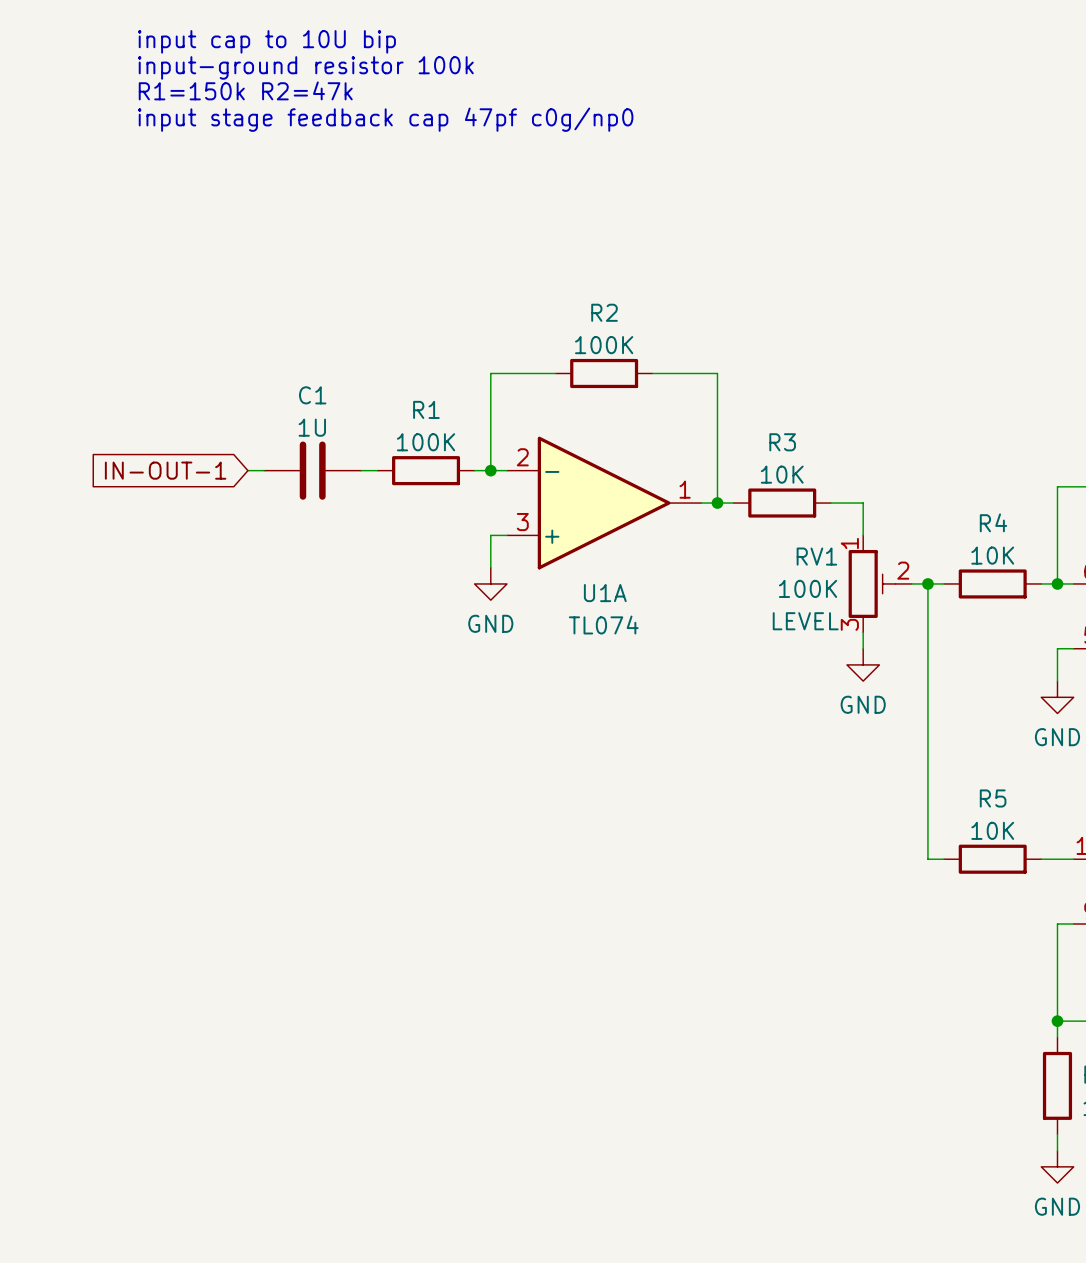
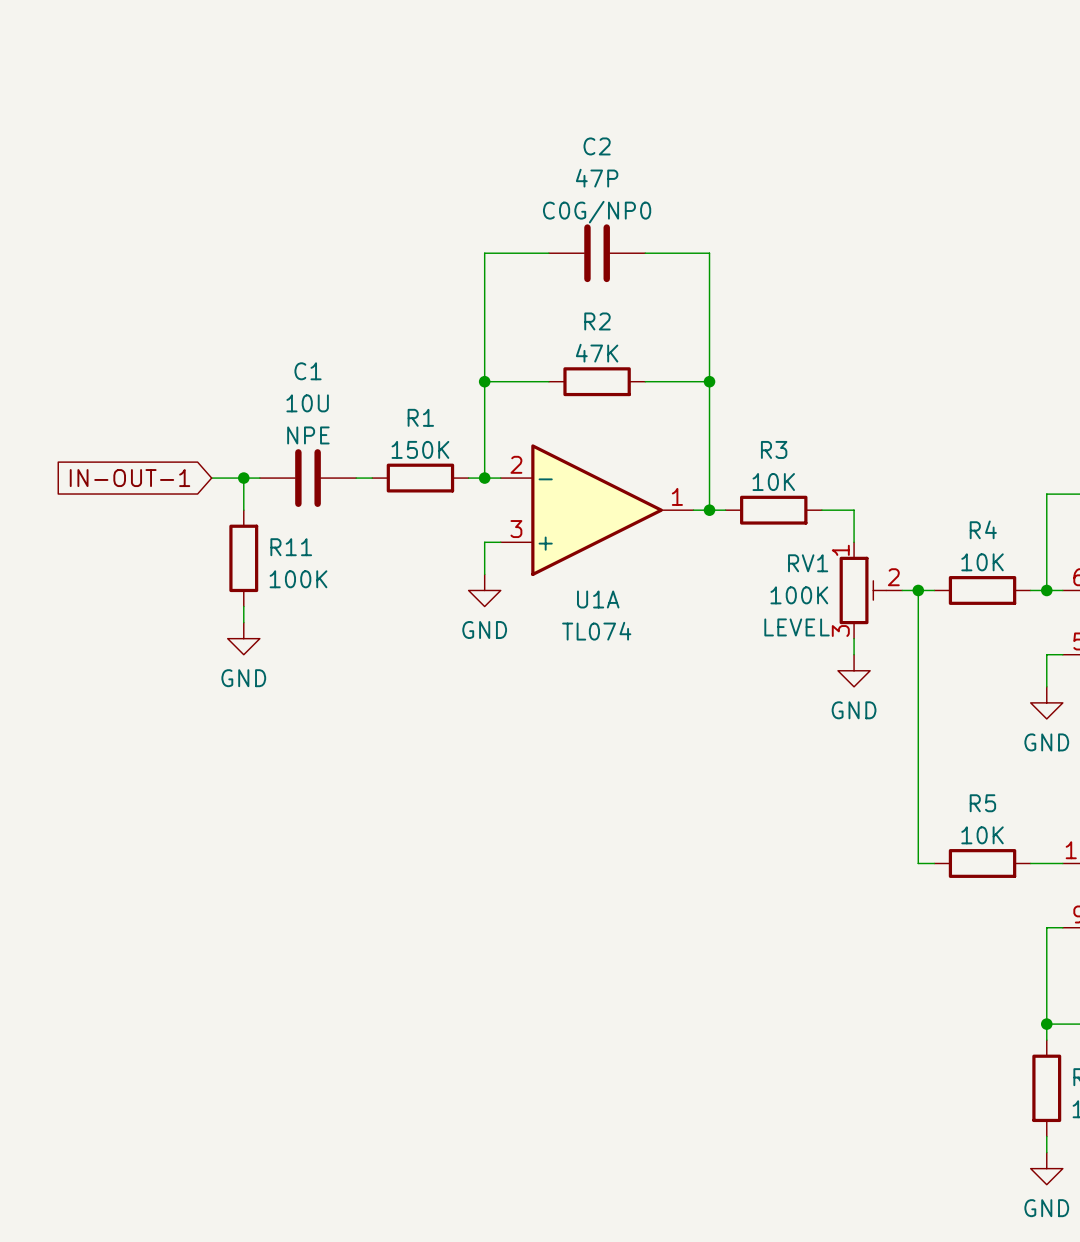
text: input cap to 10U bip (266, 41) -> none
text: input-ground resistor 100k (305, 67) -> none
text: R1=150k R2=47k (245, 90) -> none
text: input stage feedback cap 47pf c0g/np0 (385, 119) -> none
wire: none -> (548, 253) (484, 253) (484, 381)
C2: none -> 47P (597, 253)
wire: none -> (645, 253) (709, 253) (709, 381)
R2 value: 100K (604, 345) -> 47K (597, 353)
junction: none -> (484, 381)
junction: none -> (709, 381)
C1 name position: C1 (312, 395) -> C1 (308, 371)
C1 value: 1U (312, 427) -> 10U (307, 403)
C1 text: none -> NPE (308, 435)
R1 value: 100K (426, 442) -> 150K (420, 449)
global label position: IN-OUT-1 (165, 470) -> IN-OUT-1 (130, 478)
wire: none -> (211, 478) (243, 478) (243, 510)
junction: none -> (243, 478)
R11: none -> 100K (243, 558)
wire: none -> (243, 606) (243, 622)
power symbol: none -> GND (243, 638)

